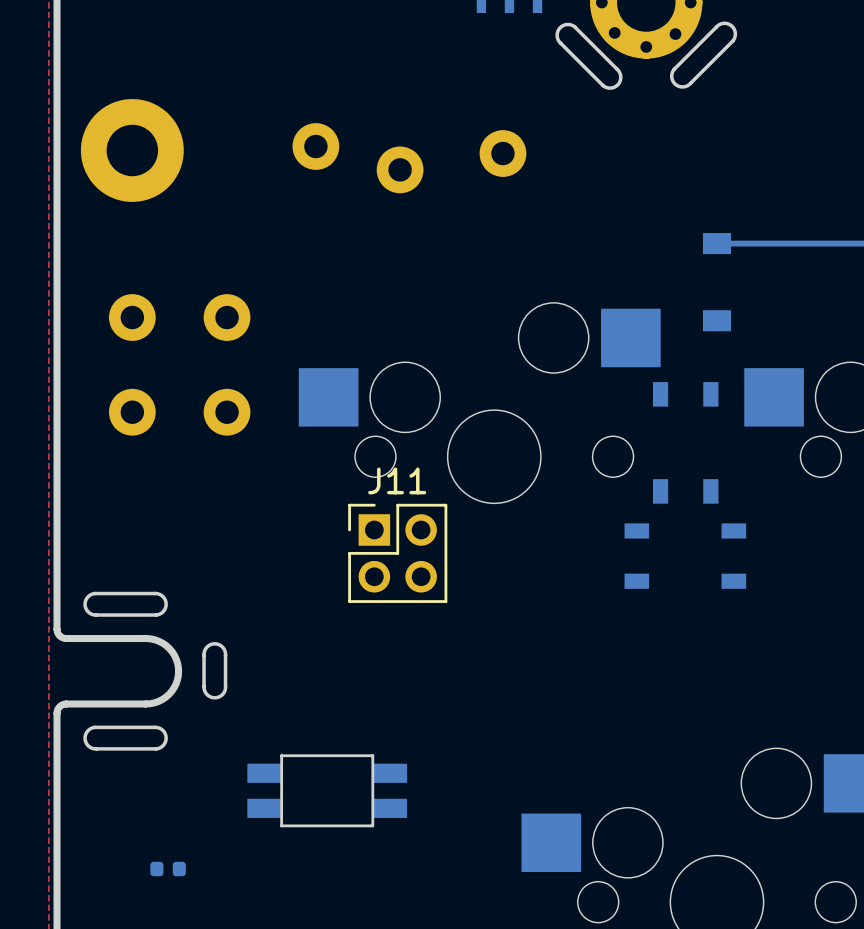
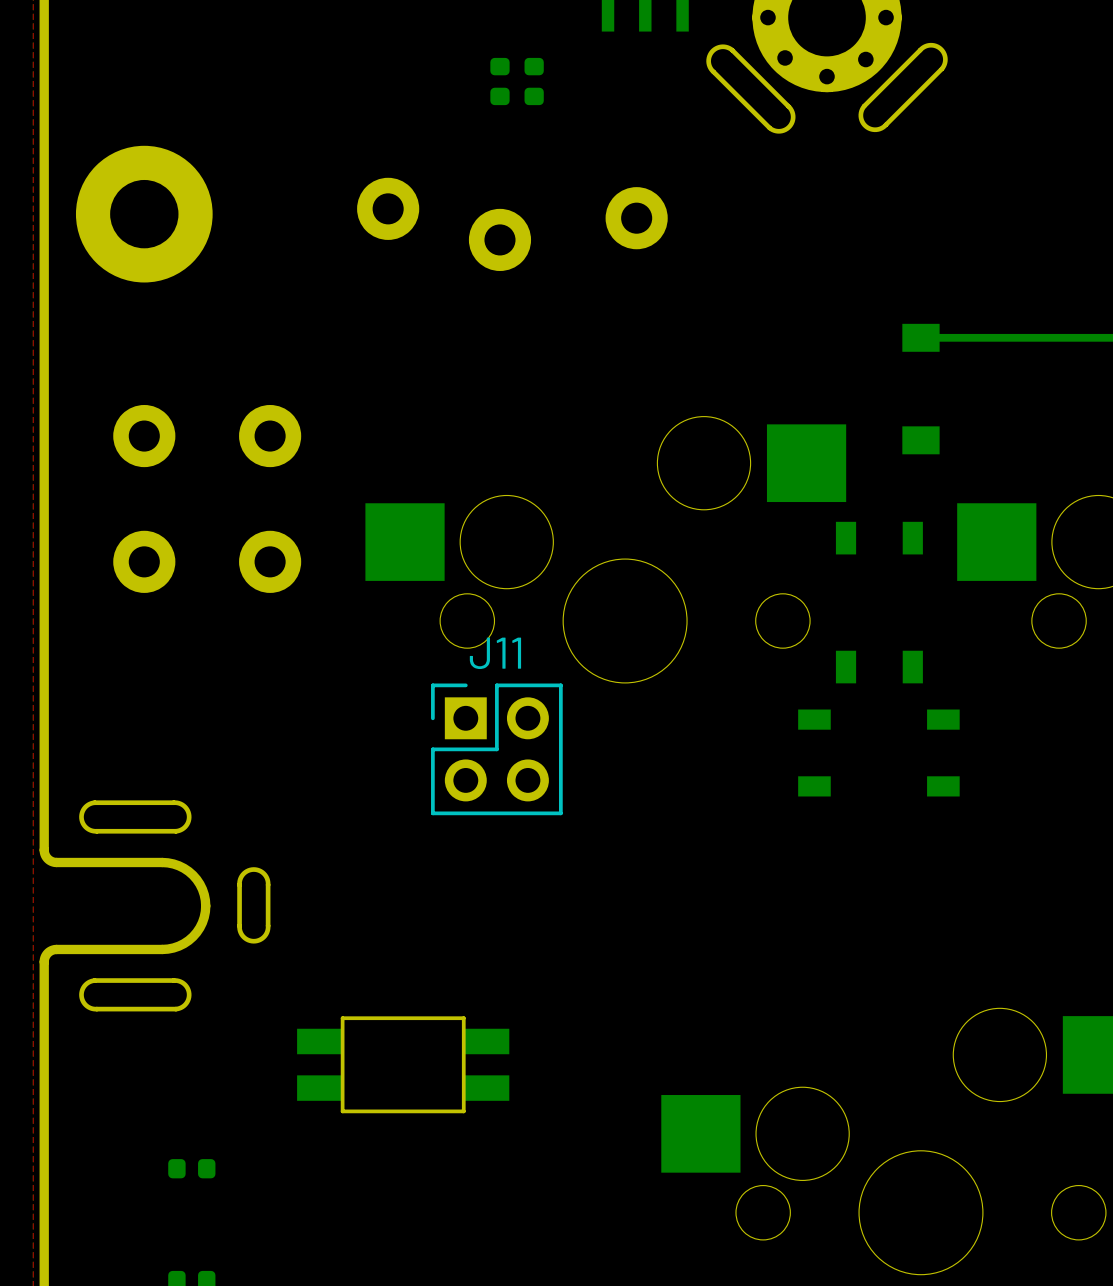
part: none -> (499, 81)
part: none -> (534, 81)

